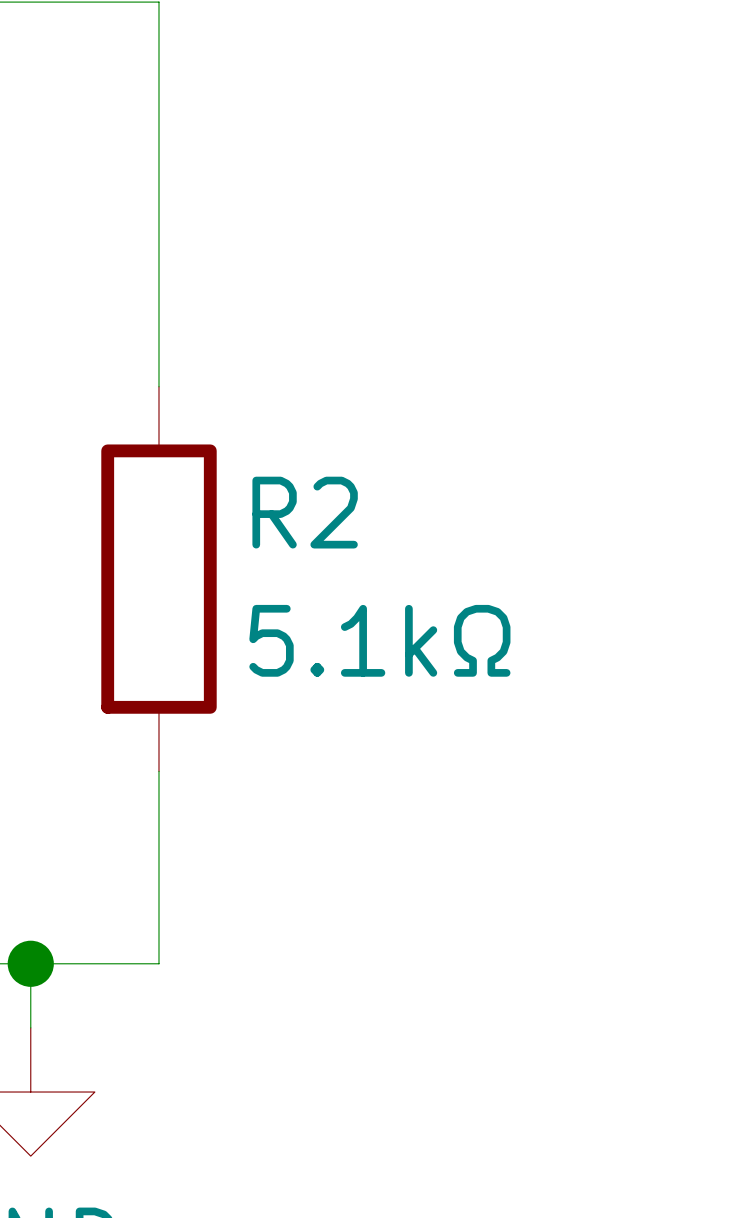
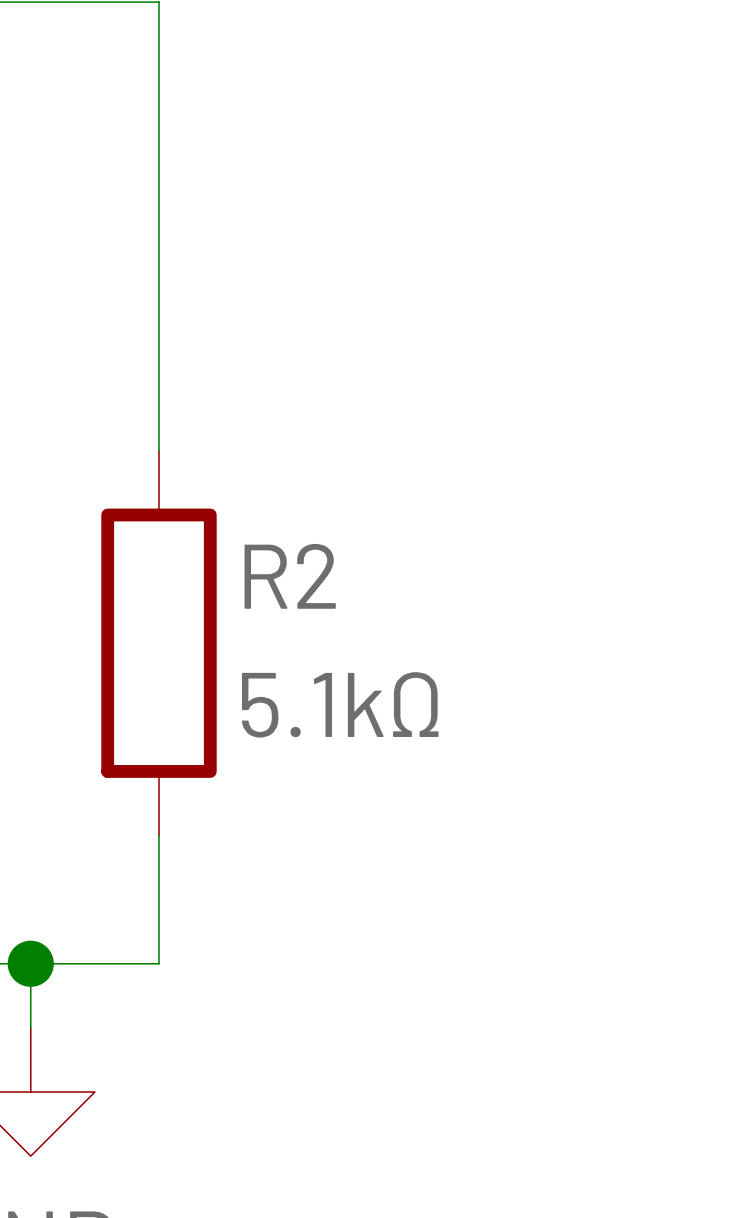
R2 position: (158, 579) -> (158, 643)

